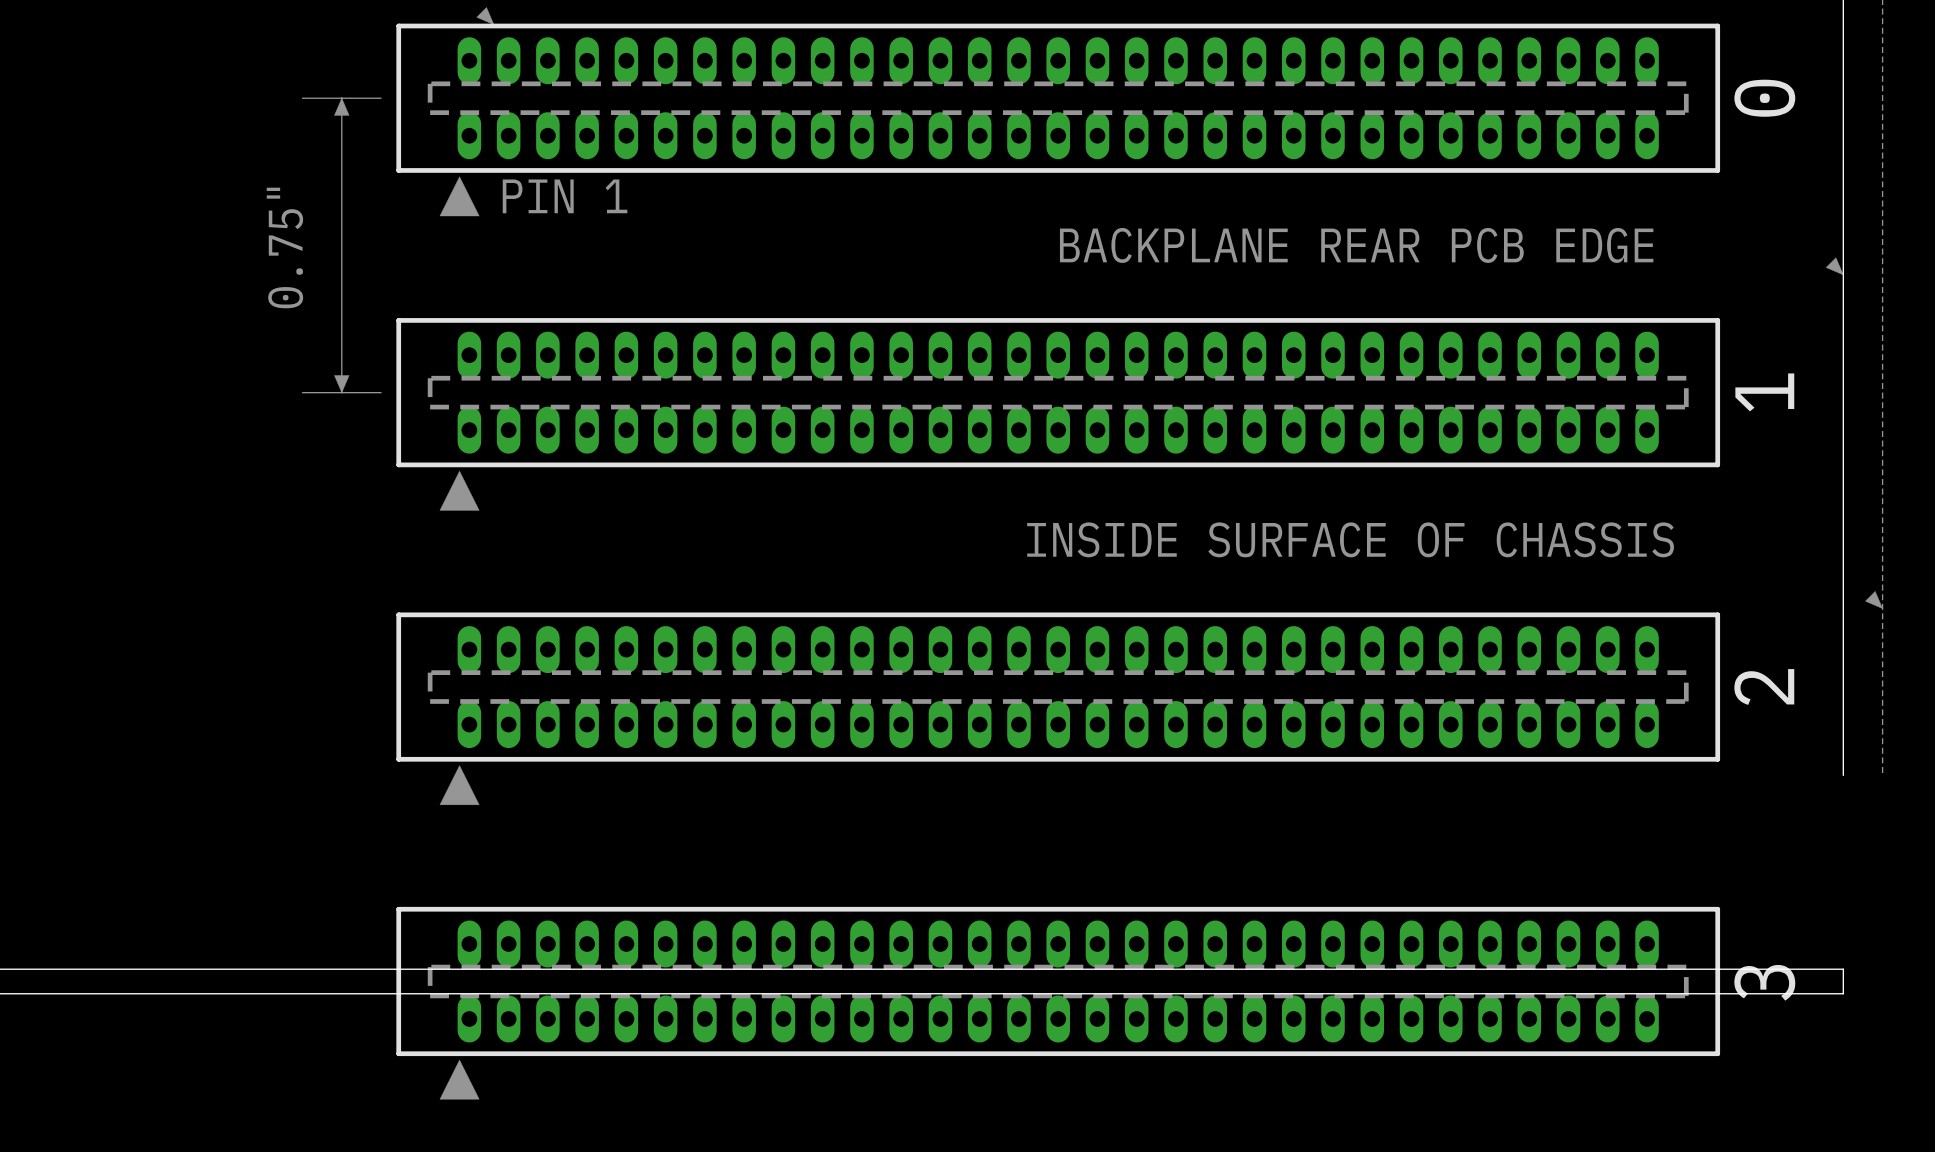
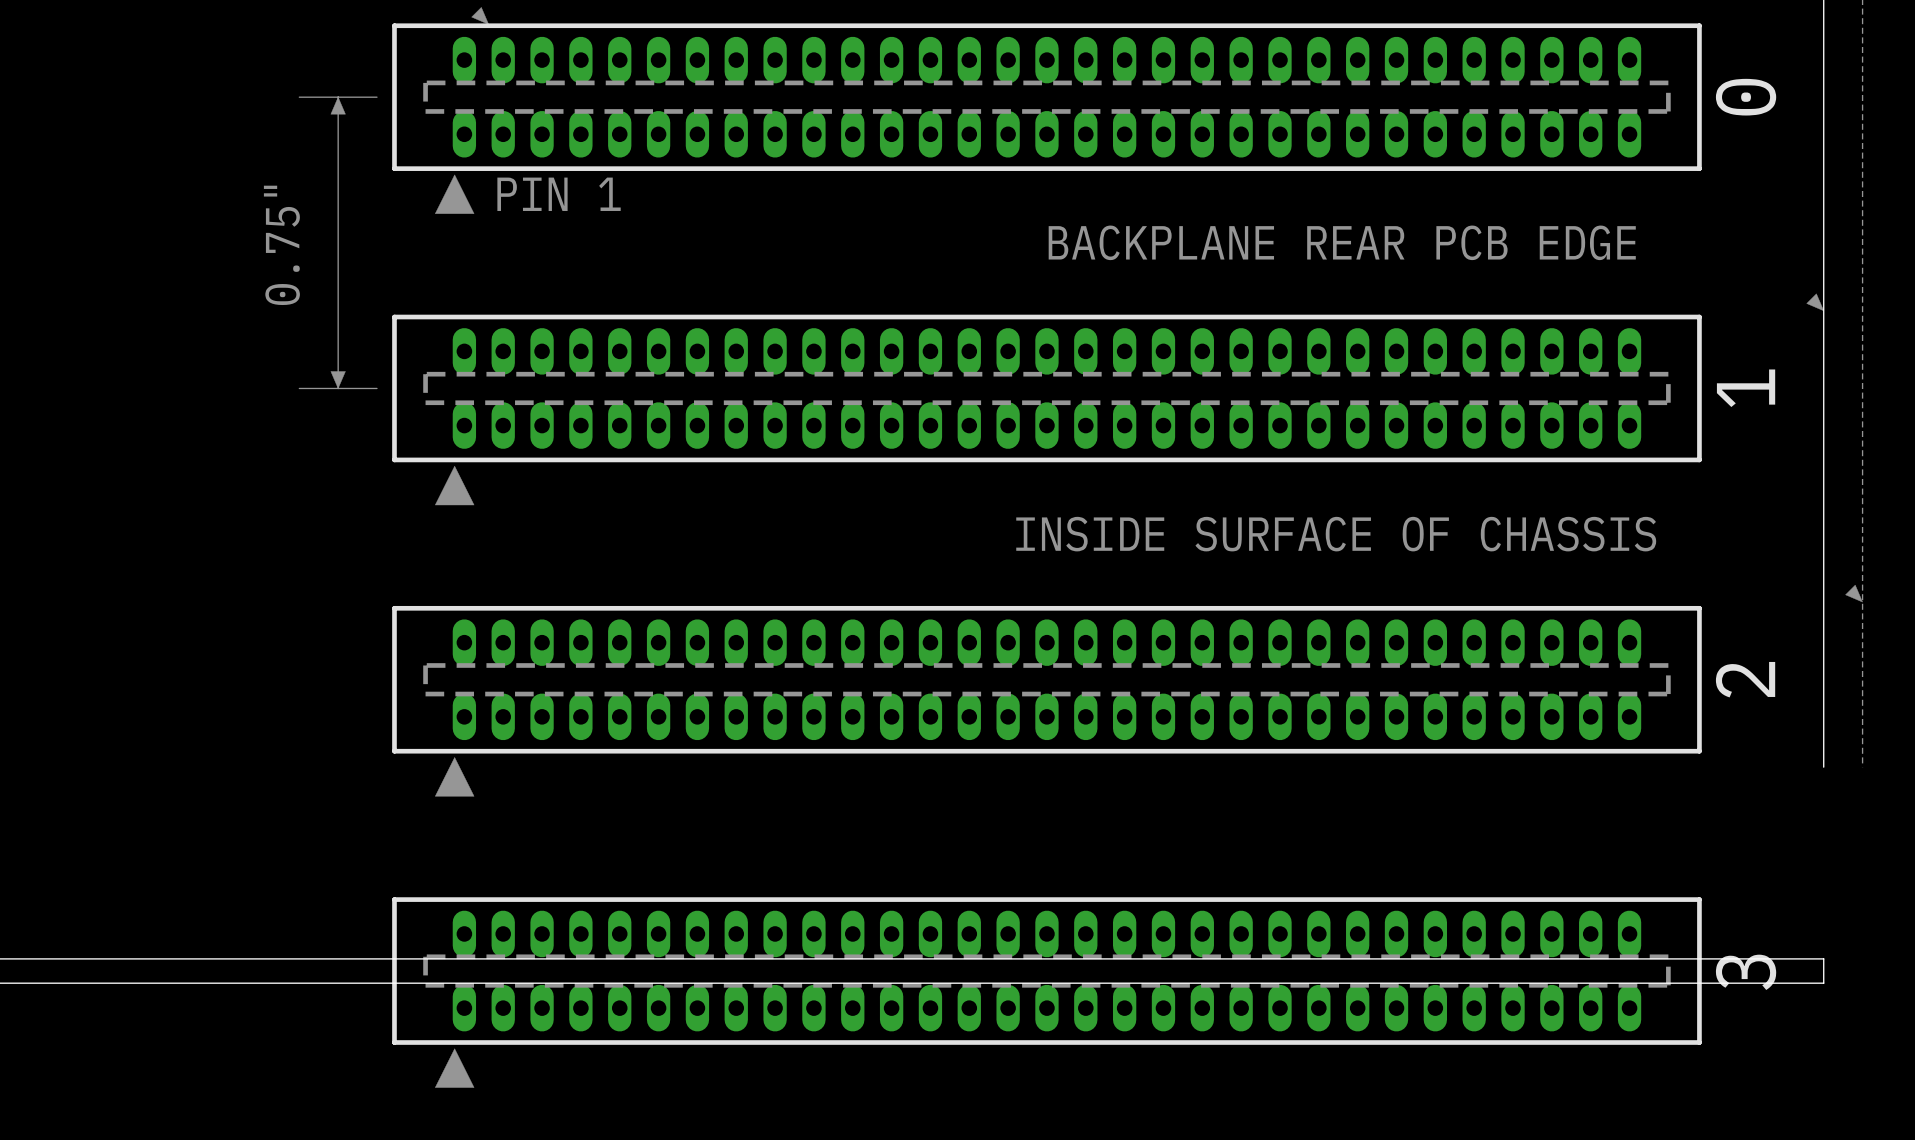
drawing position: (1834, 266) -> (1815, 302)

